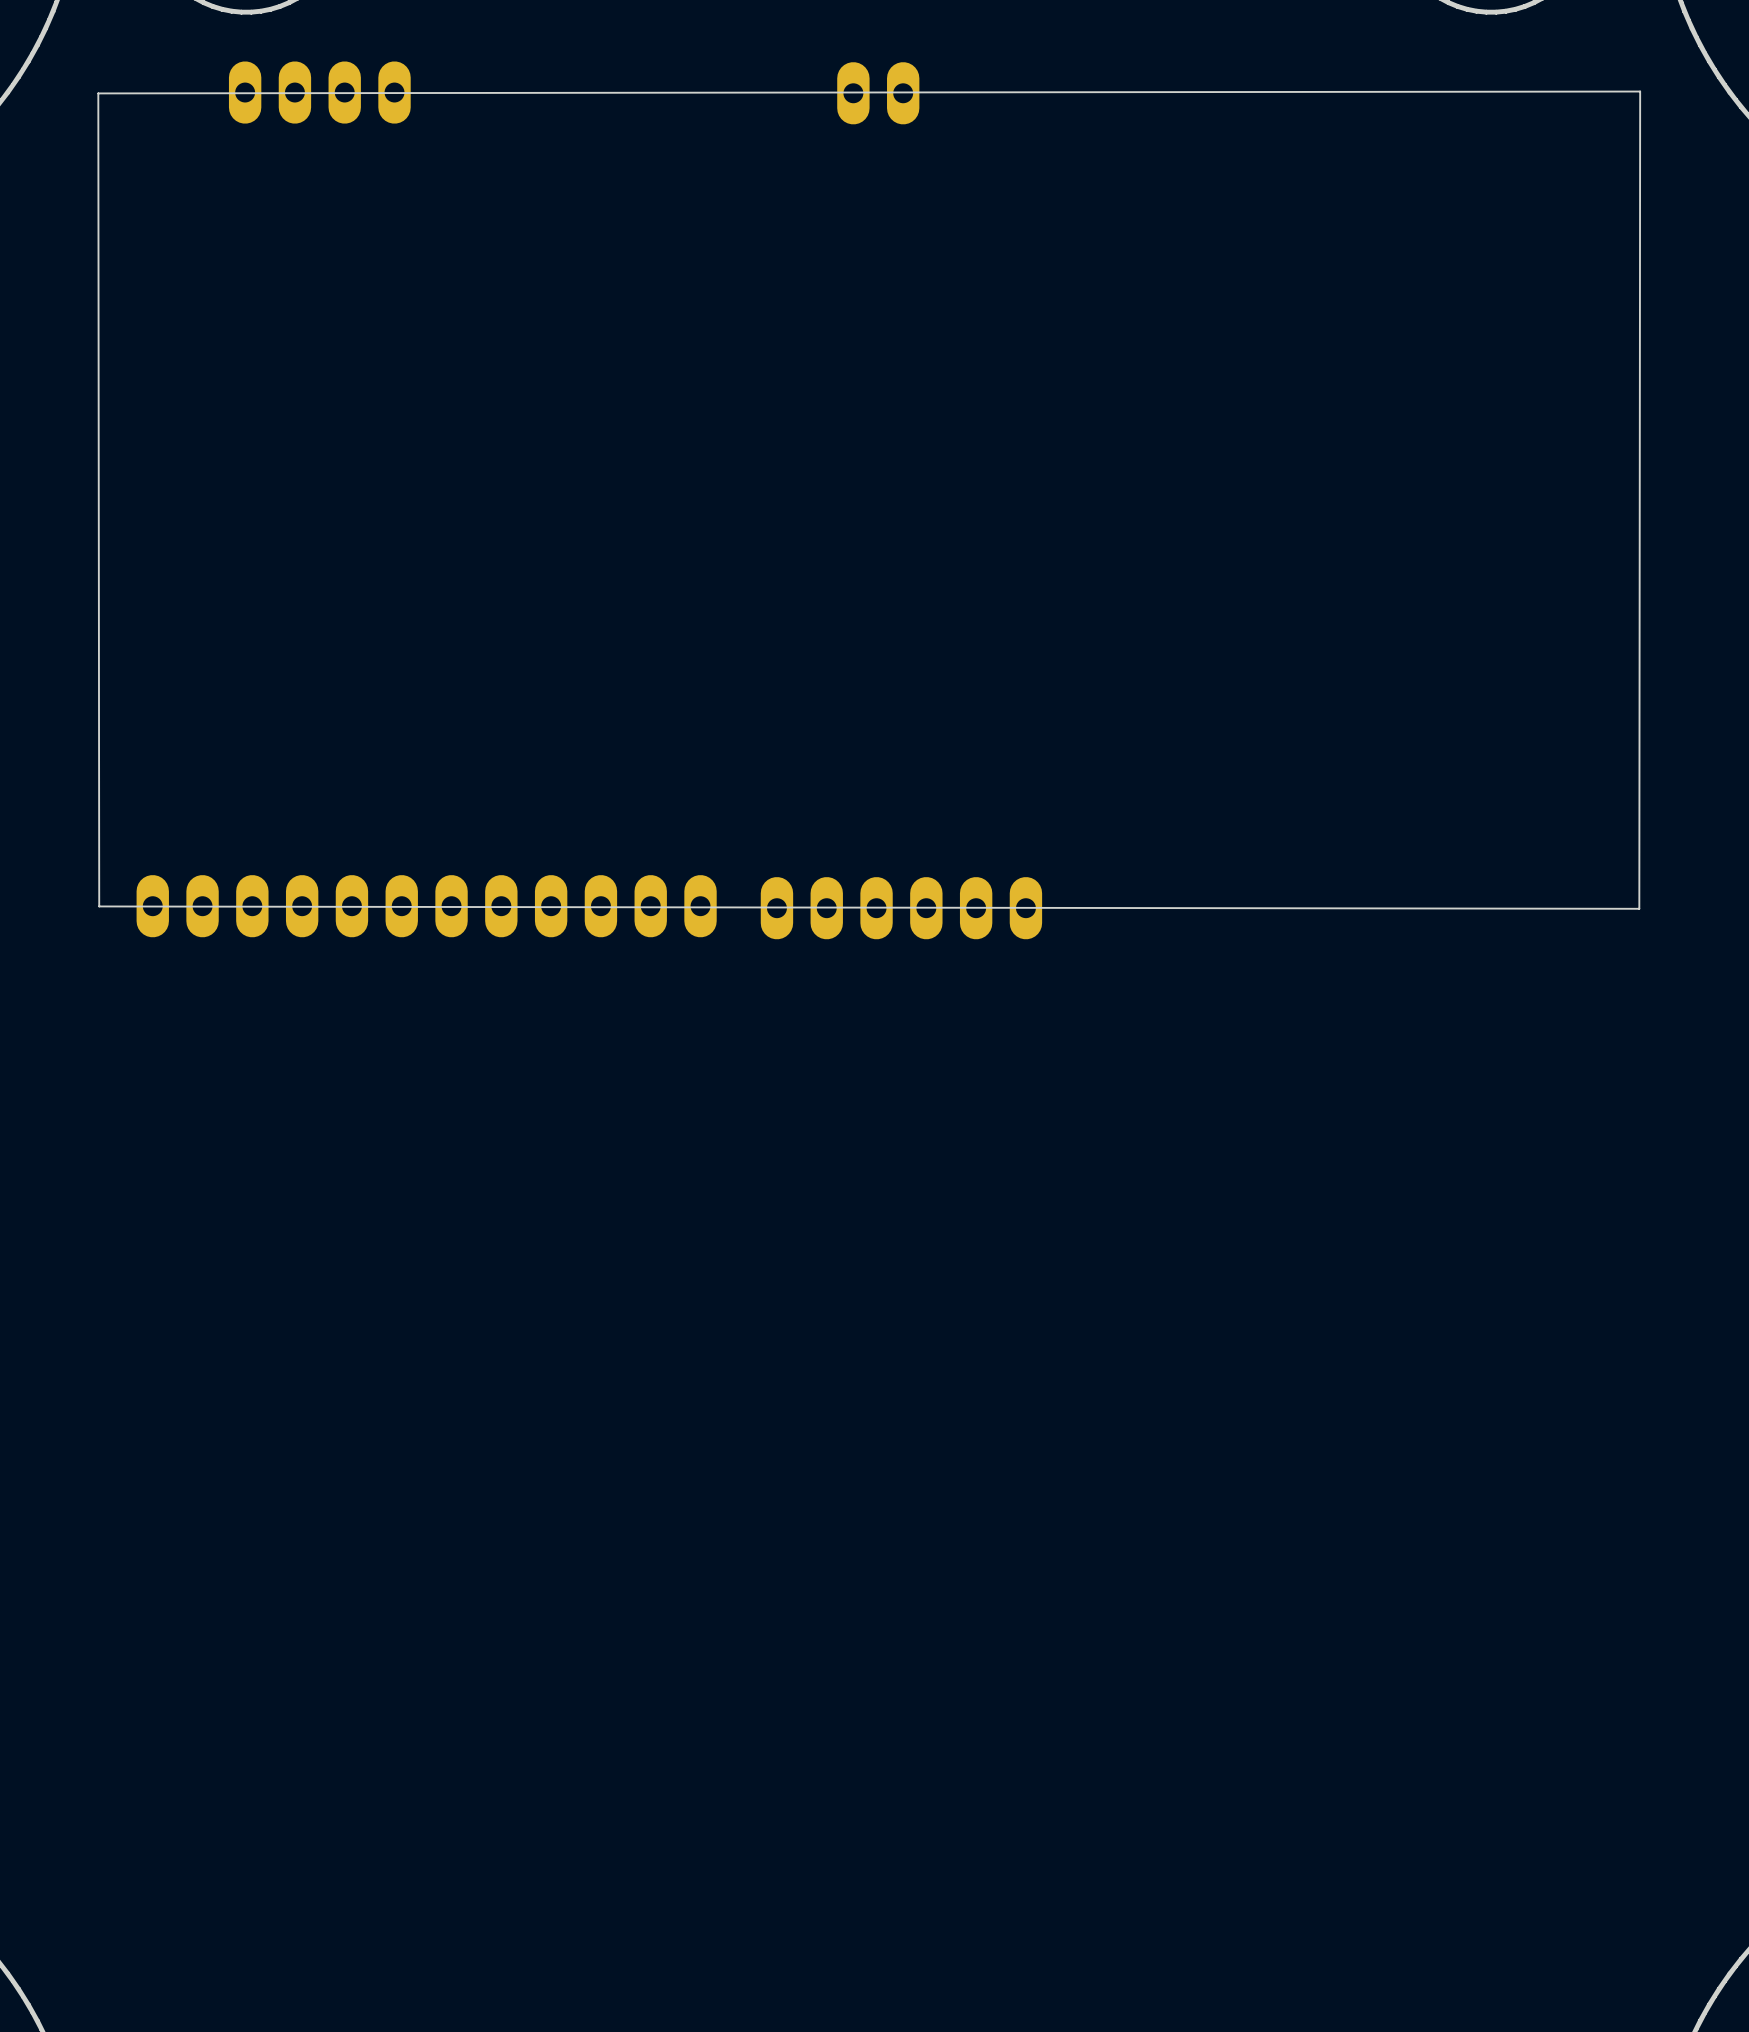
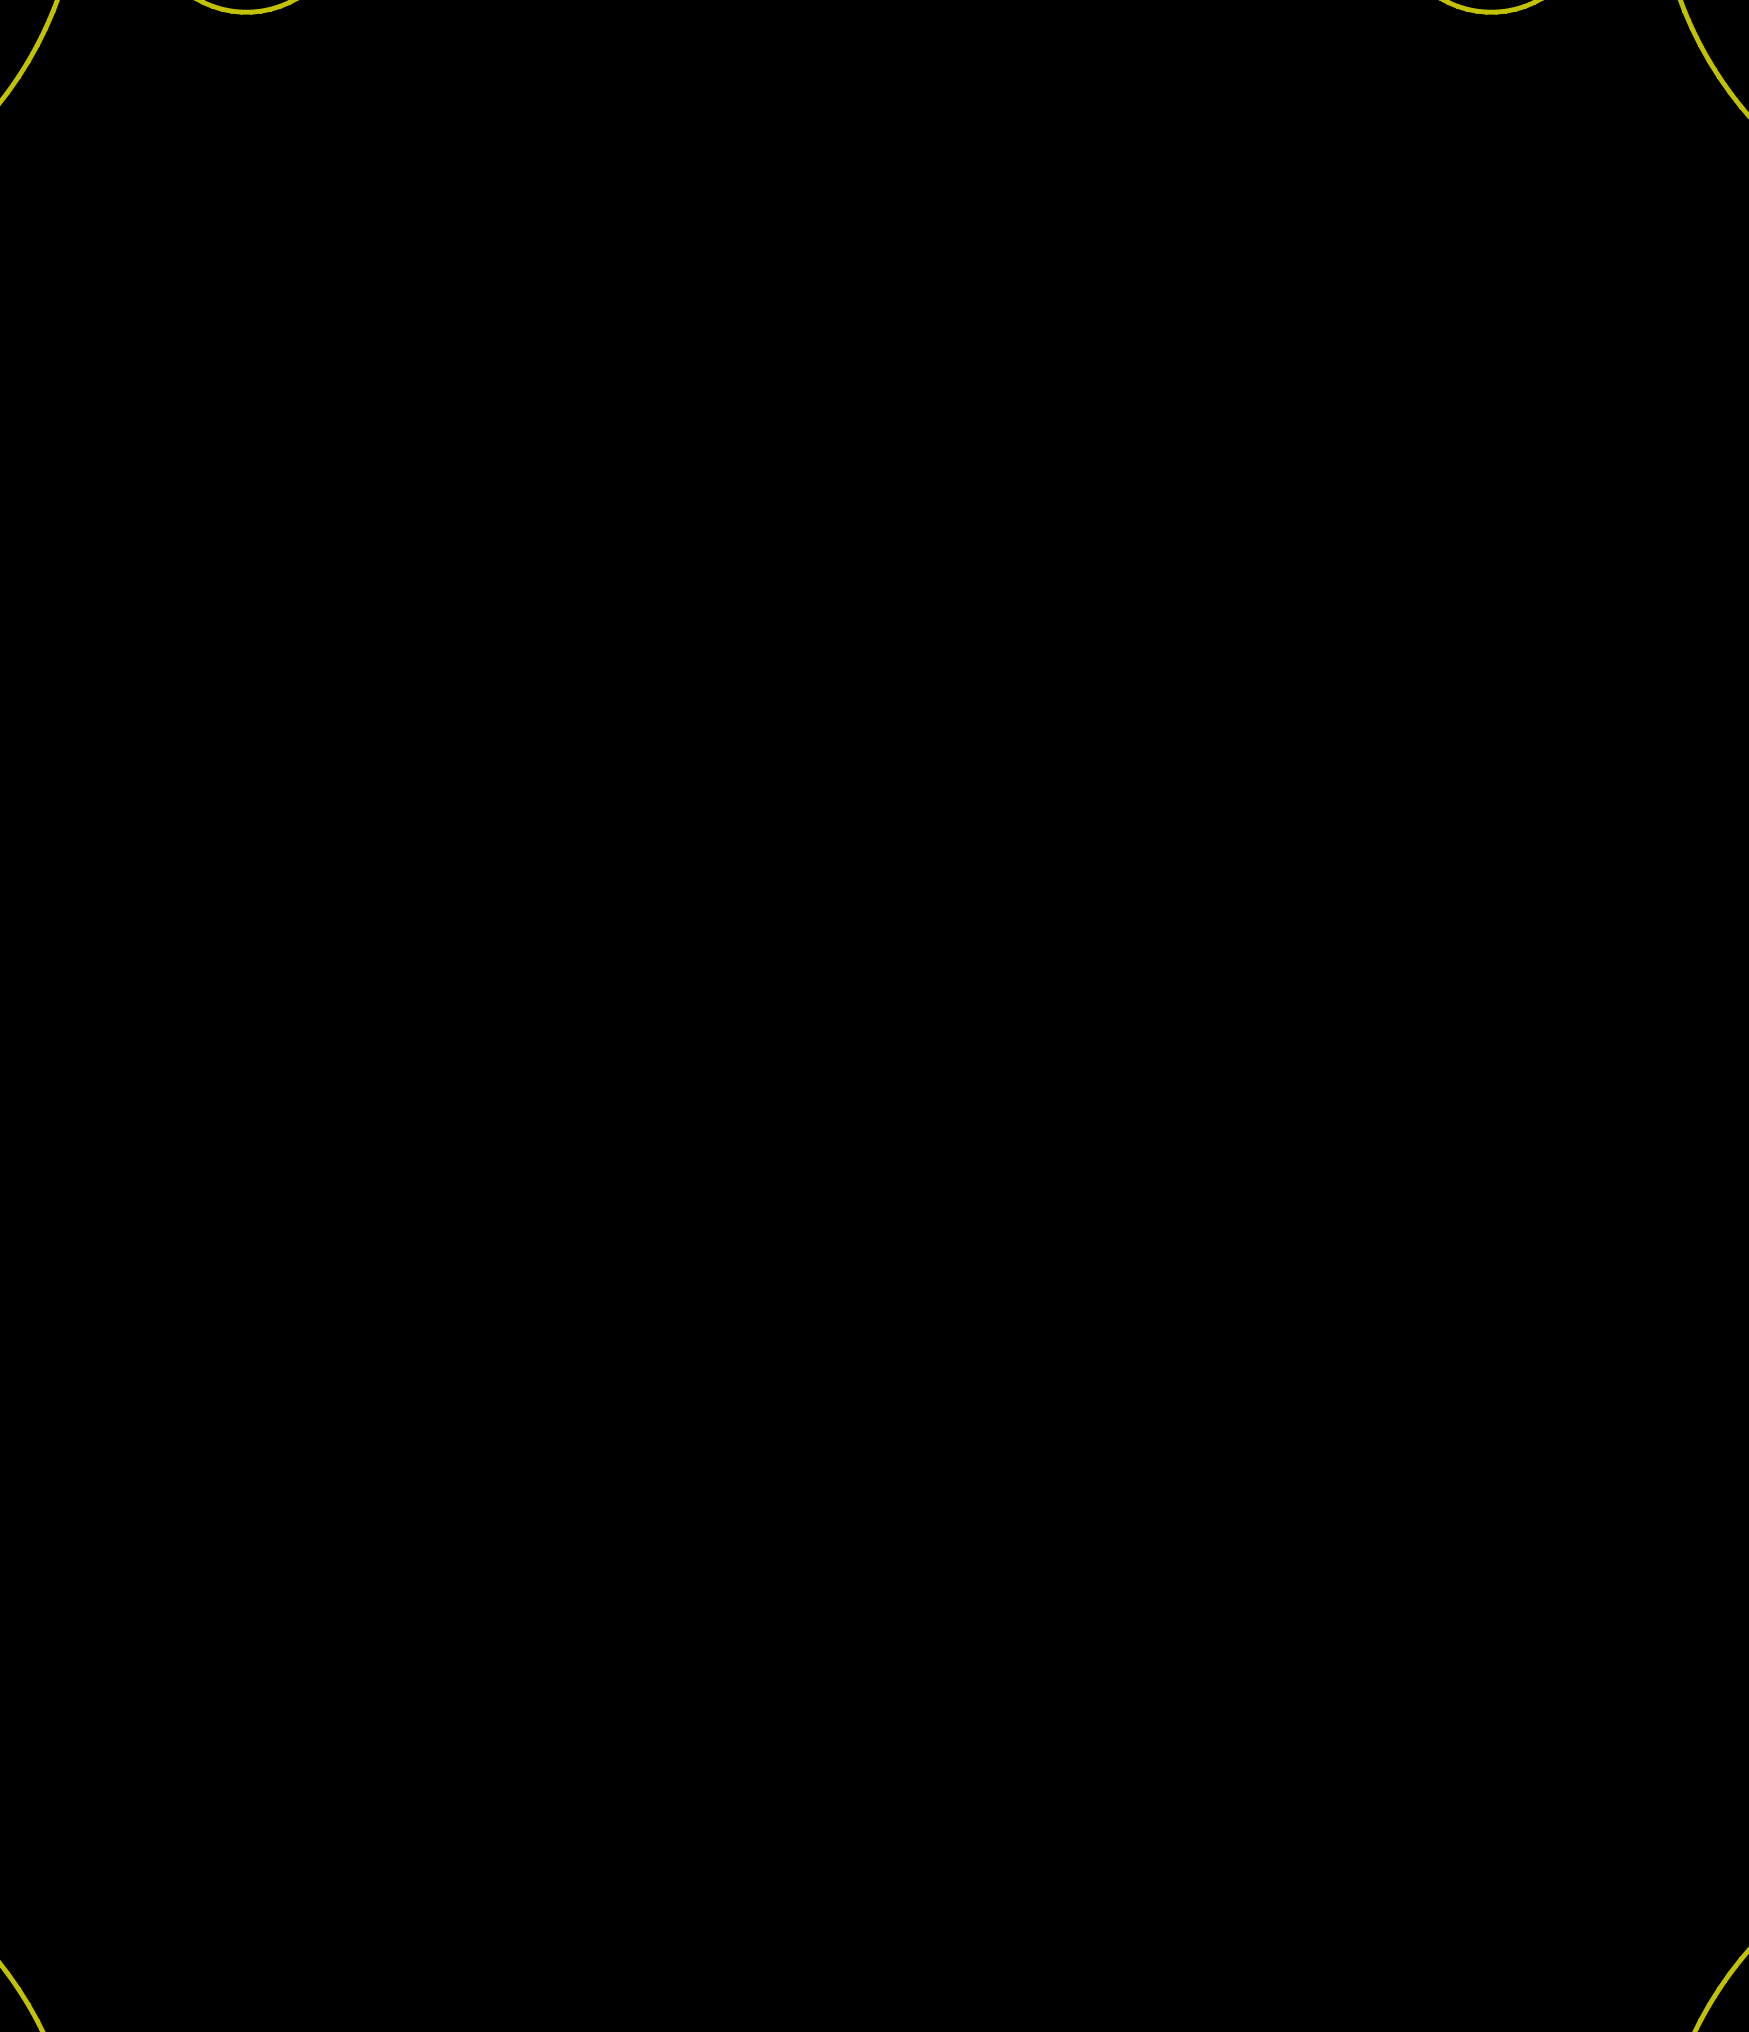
part: (869, 500) -> none

